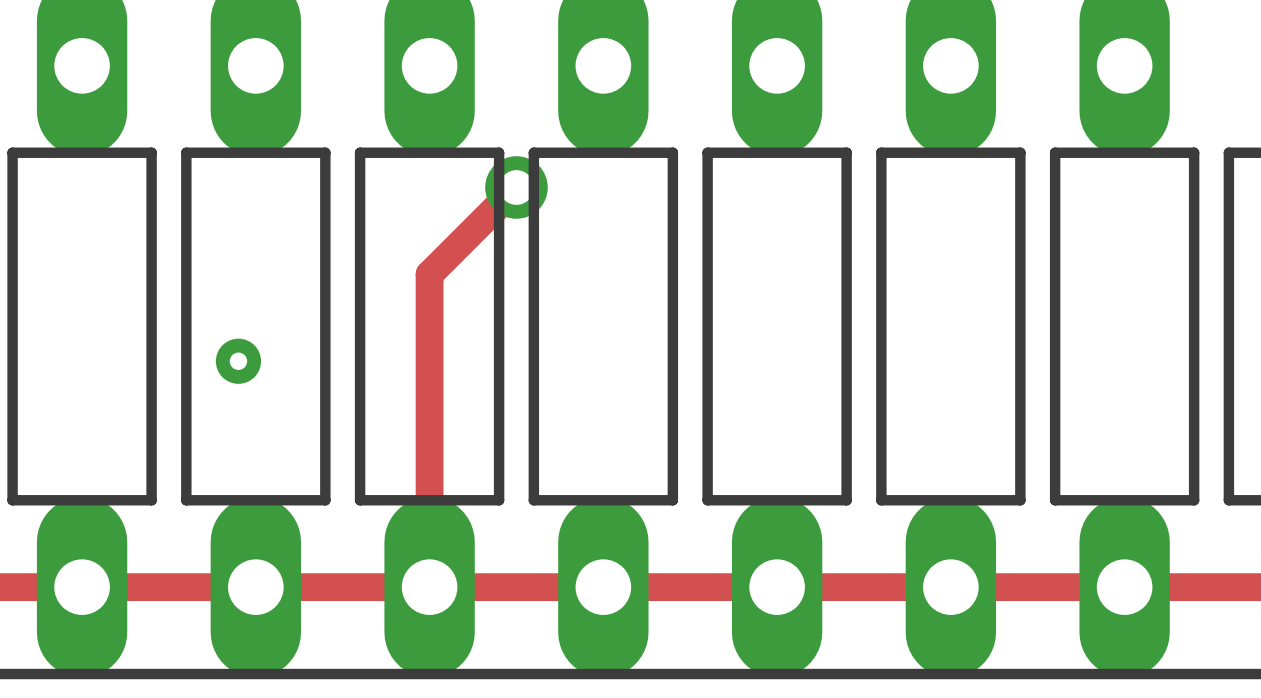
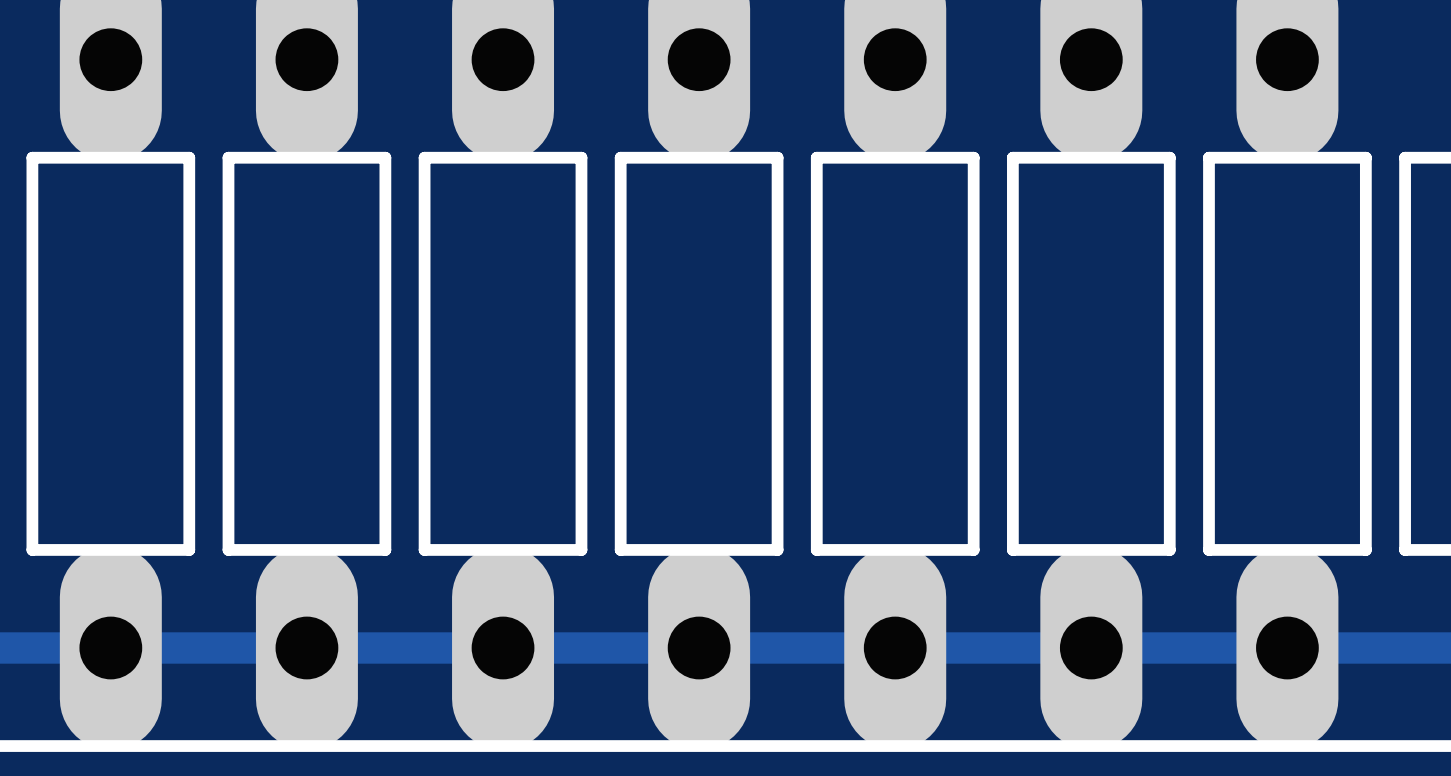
track: (516, 187) (429, 274) (429, 587) -> none
via: (516, 187) -> none
via: (238, 361) -> none

